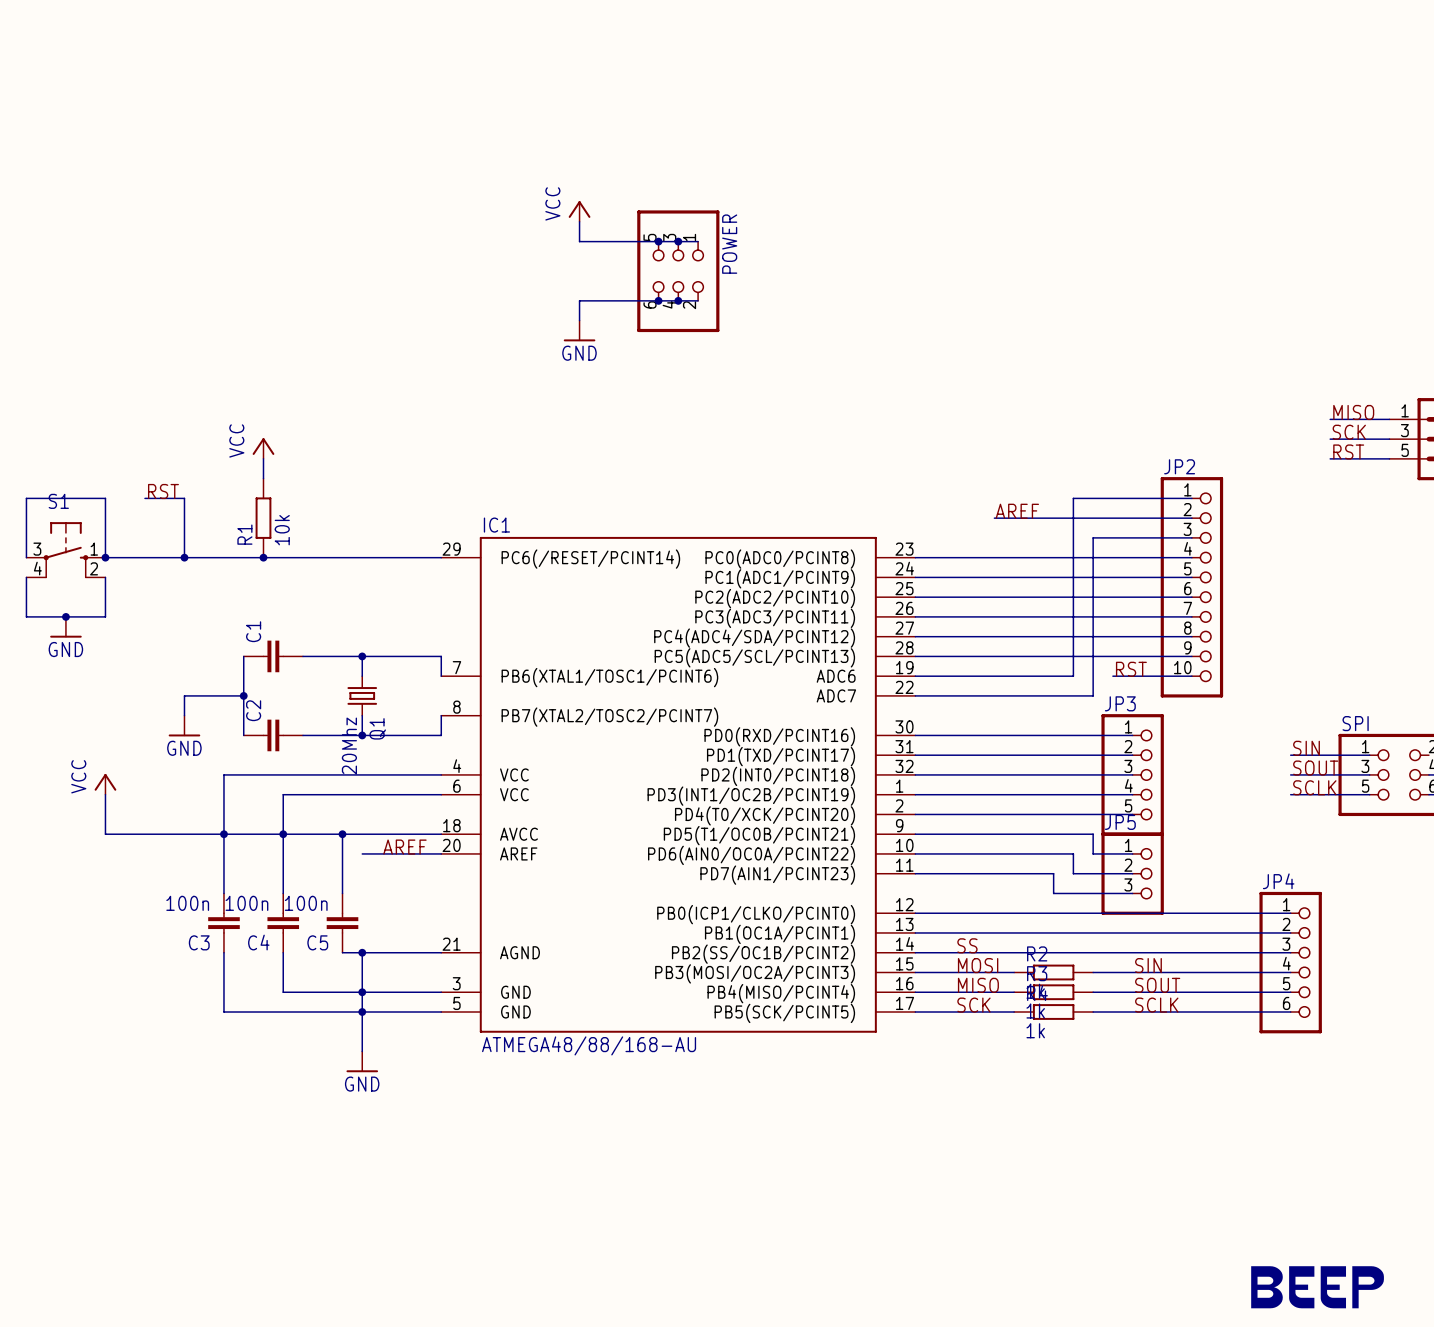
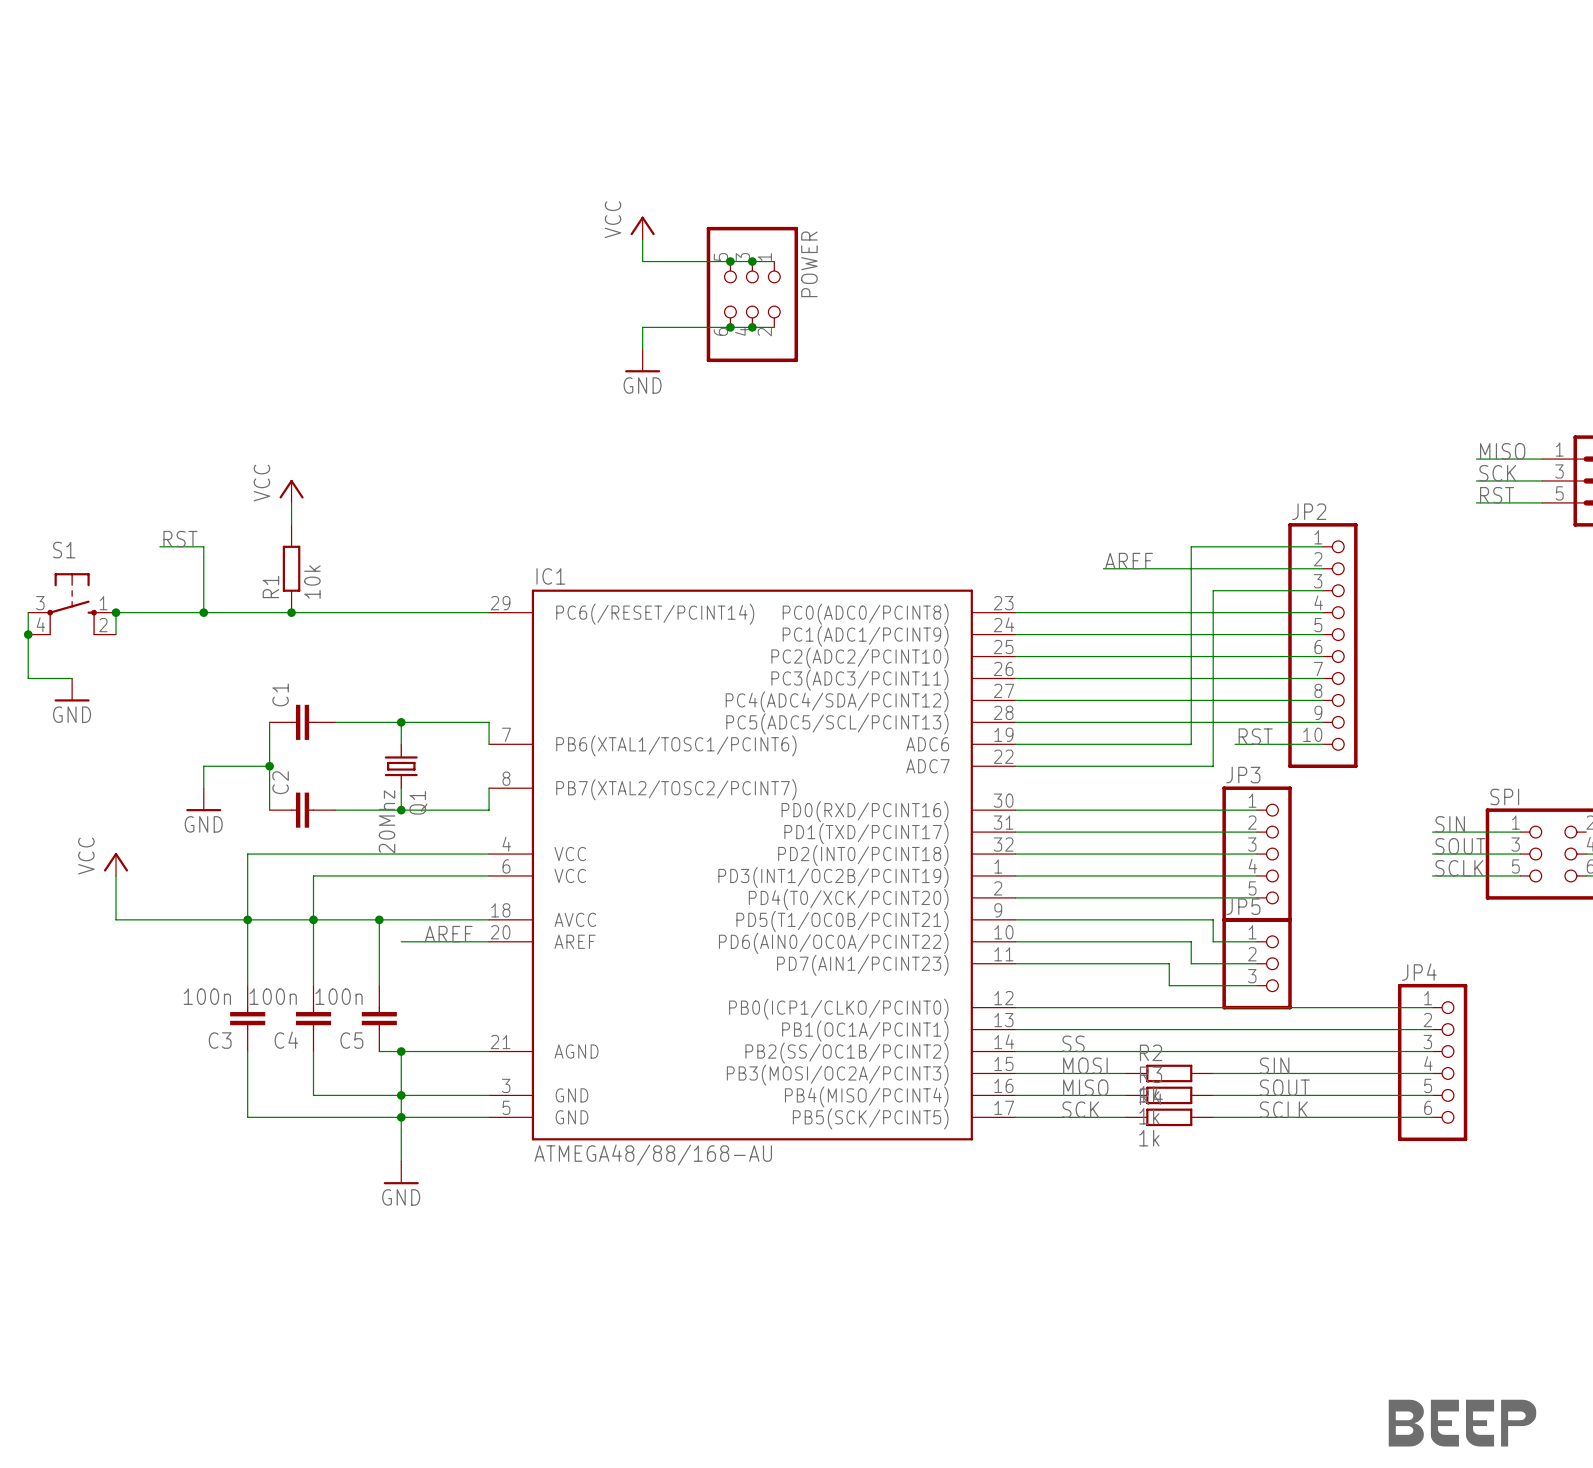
wire: (26, 557) (26, 498) (105, 498) (105, 557) -> (28, 612) (28, 634)
junction: none -> (28, 634)
wire: (105, 577) (105, 616) (65, 616) -> (116, 634) (116, 612)
junction: (65, 616) -> none

